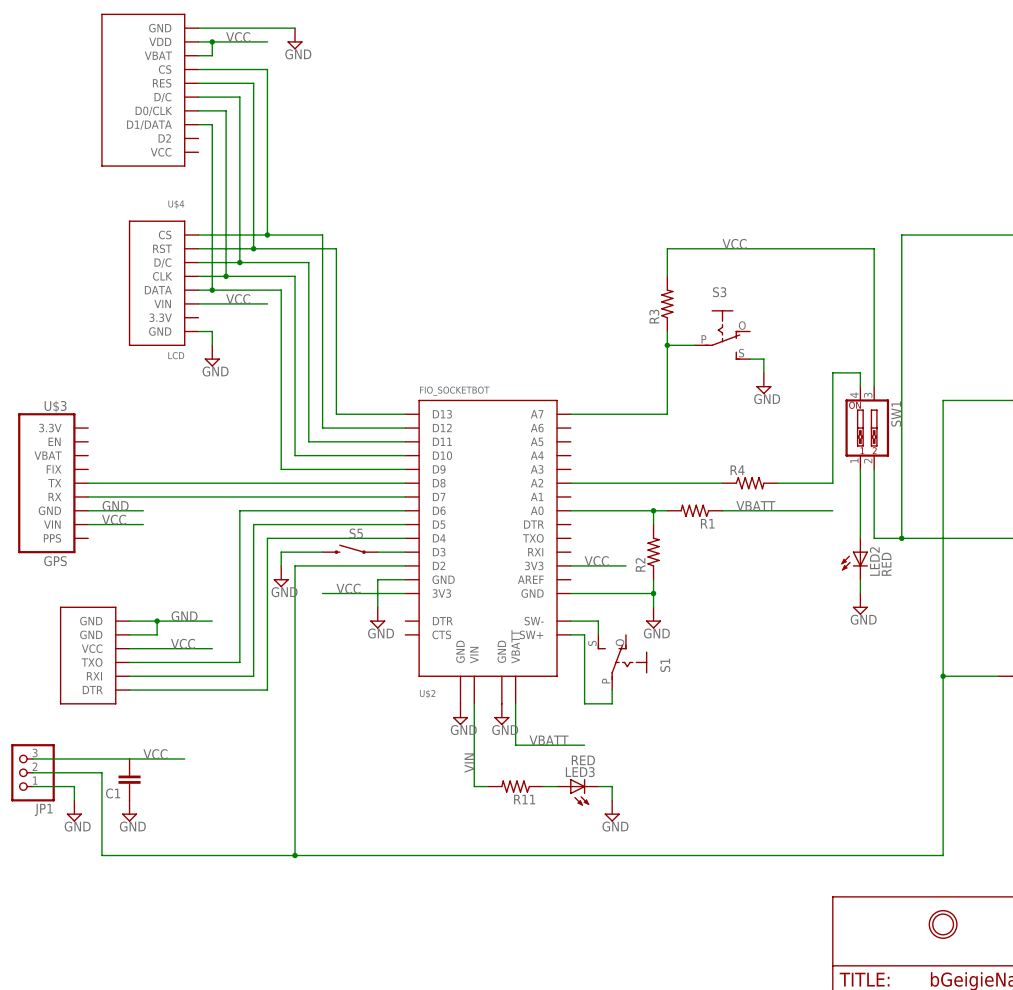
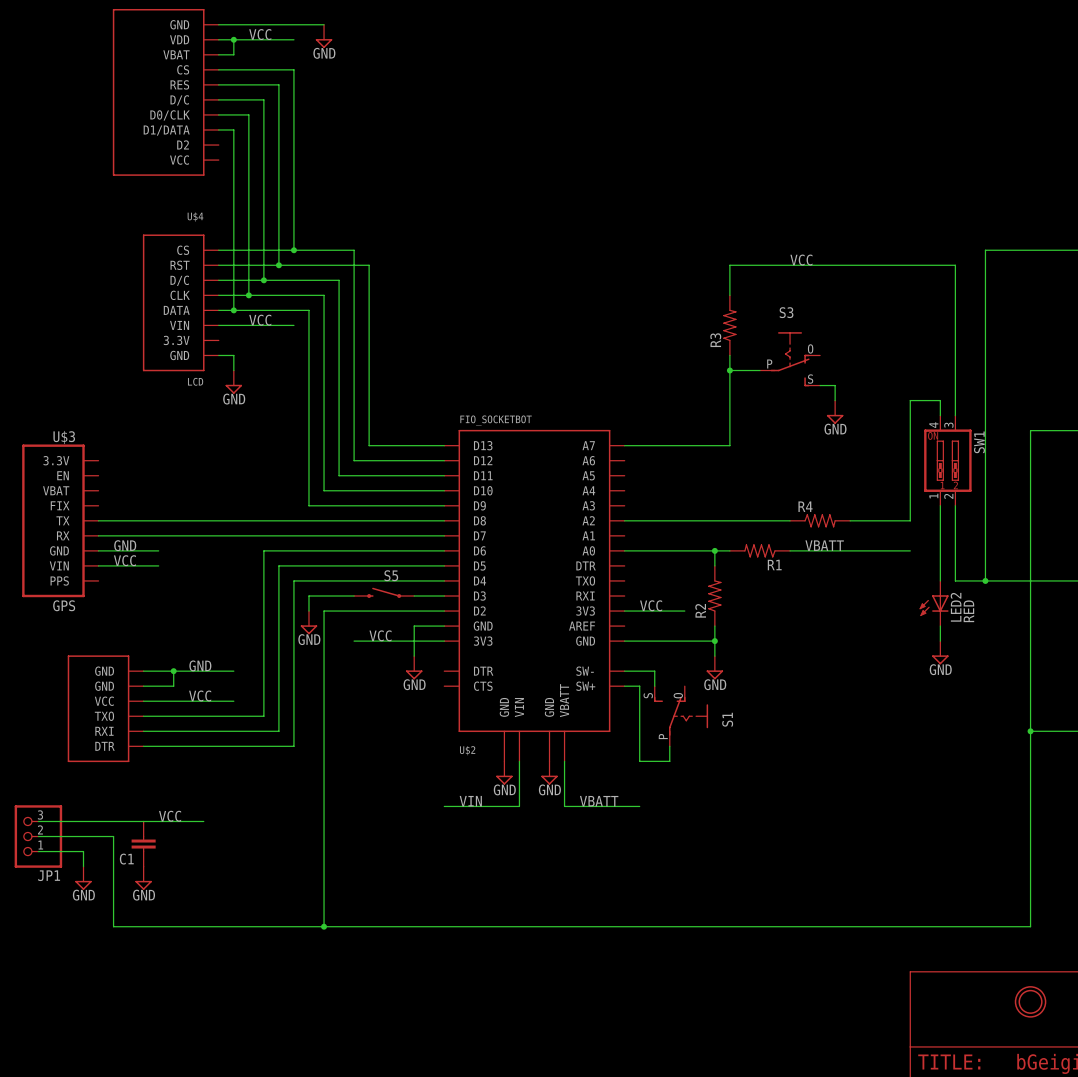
wire: (474, 745) (474, 786) (488, 786) -> (519, 806) (444, 806)
label rotation: 0° (469, 763) -> 90° clockwise (470, 801)
label position: VIN (469, 763) -> VIN (470, 801)
R11: (515, 786) -> none
wire: (543, 786) (557, 786) -> none
wire: (598, 786) (612, 786) (612, 800) -> none
LED3: RED (577, 792) -> none
power symbol: GND (612, 811) -> none

